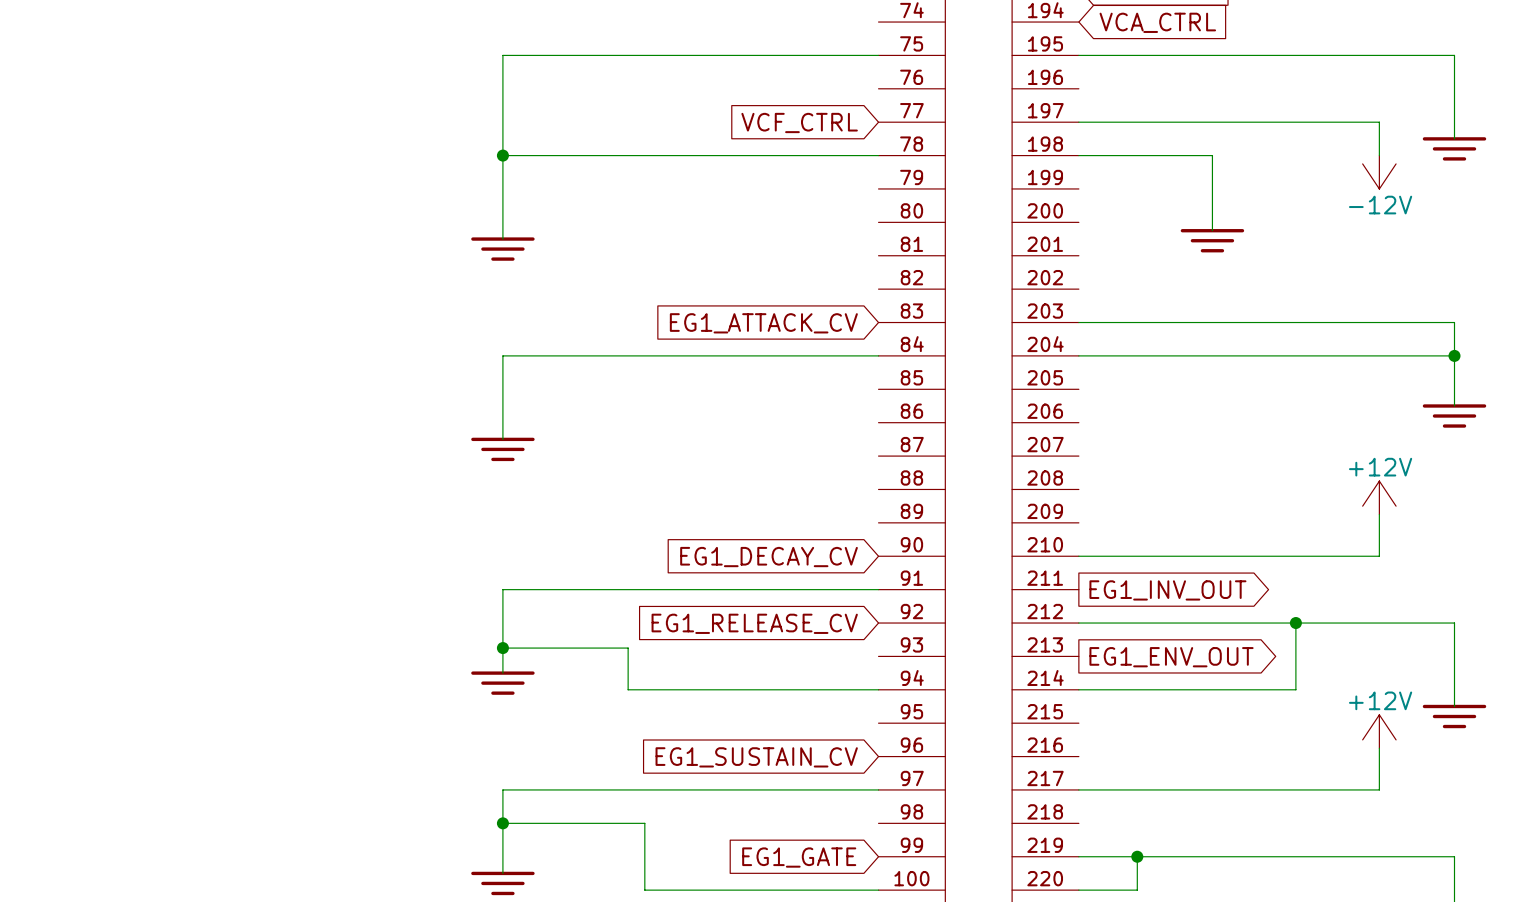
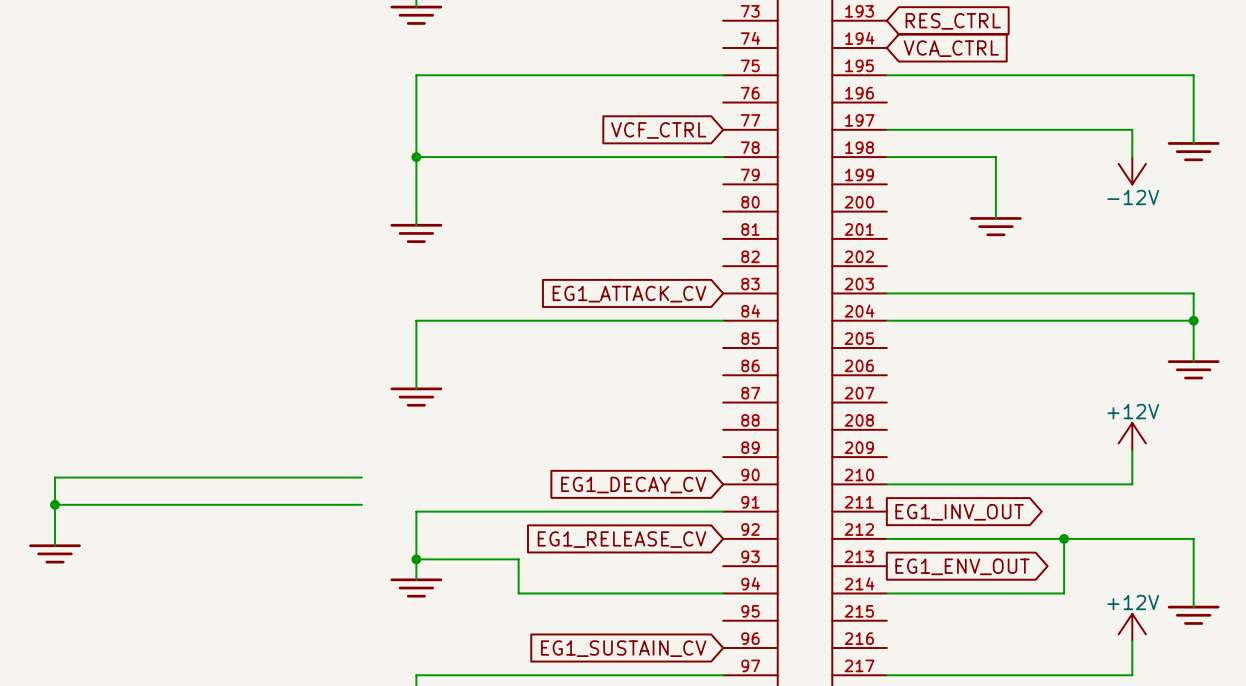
wire: none -> (361, 477) (54, 477) (54, 545)
wire: none -> (54, 504) (361, 504)
junction: none -> (54, 504)
power symbol: none -> (54, 553)

